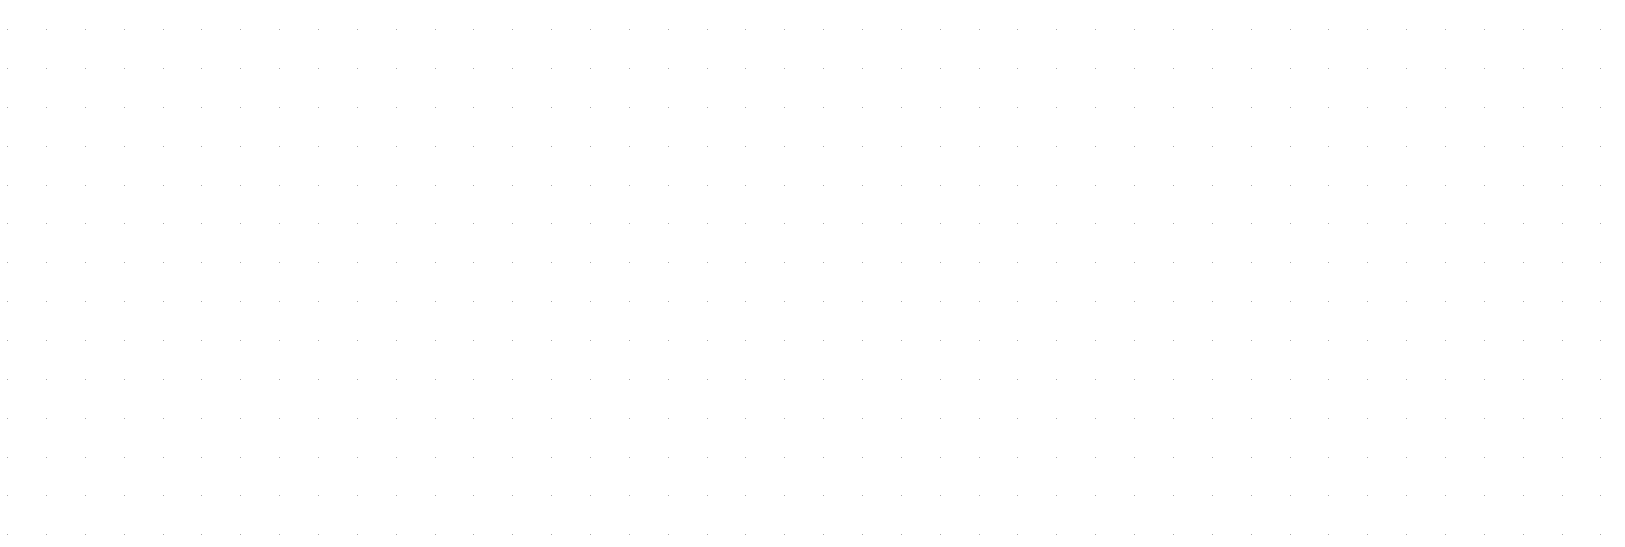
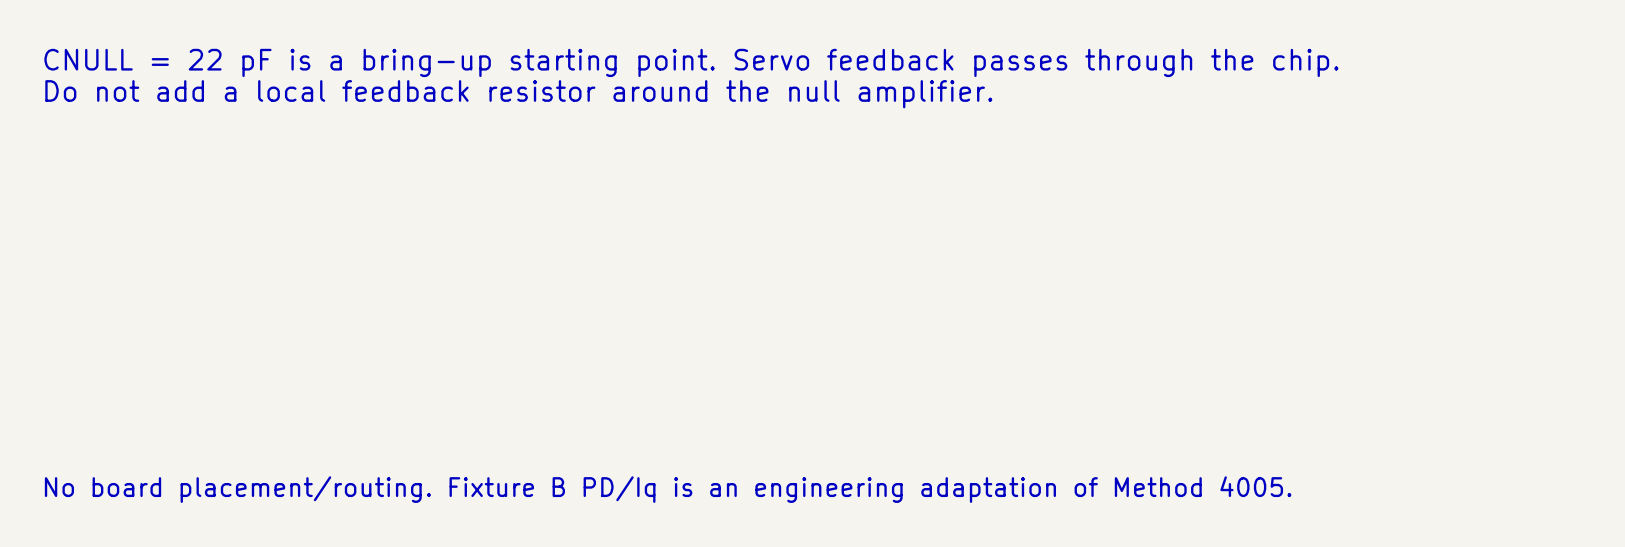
text: none -> CNULL = 22 pF is a bring-up starting point. Servo feedback passes through the chip. (691, 62)
text: none -> Do not add a local feedback resistor around the null amplifier. (518, 94)
text: none -> No board placement/routing. Fixture B PD/Iq is an engineering adaptation of Method 4005. (668, 489)

